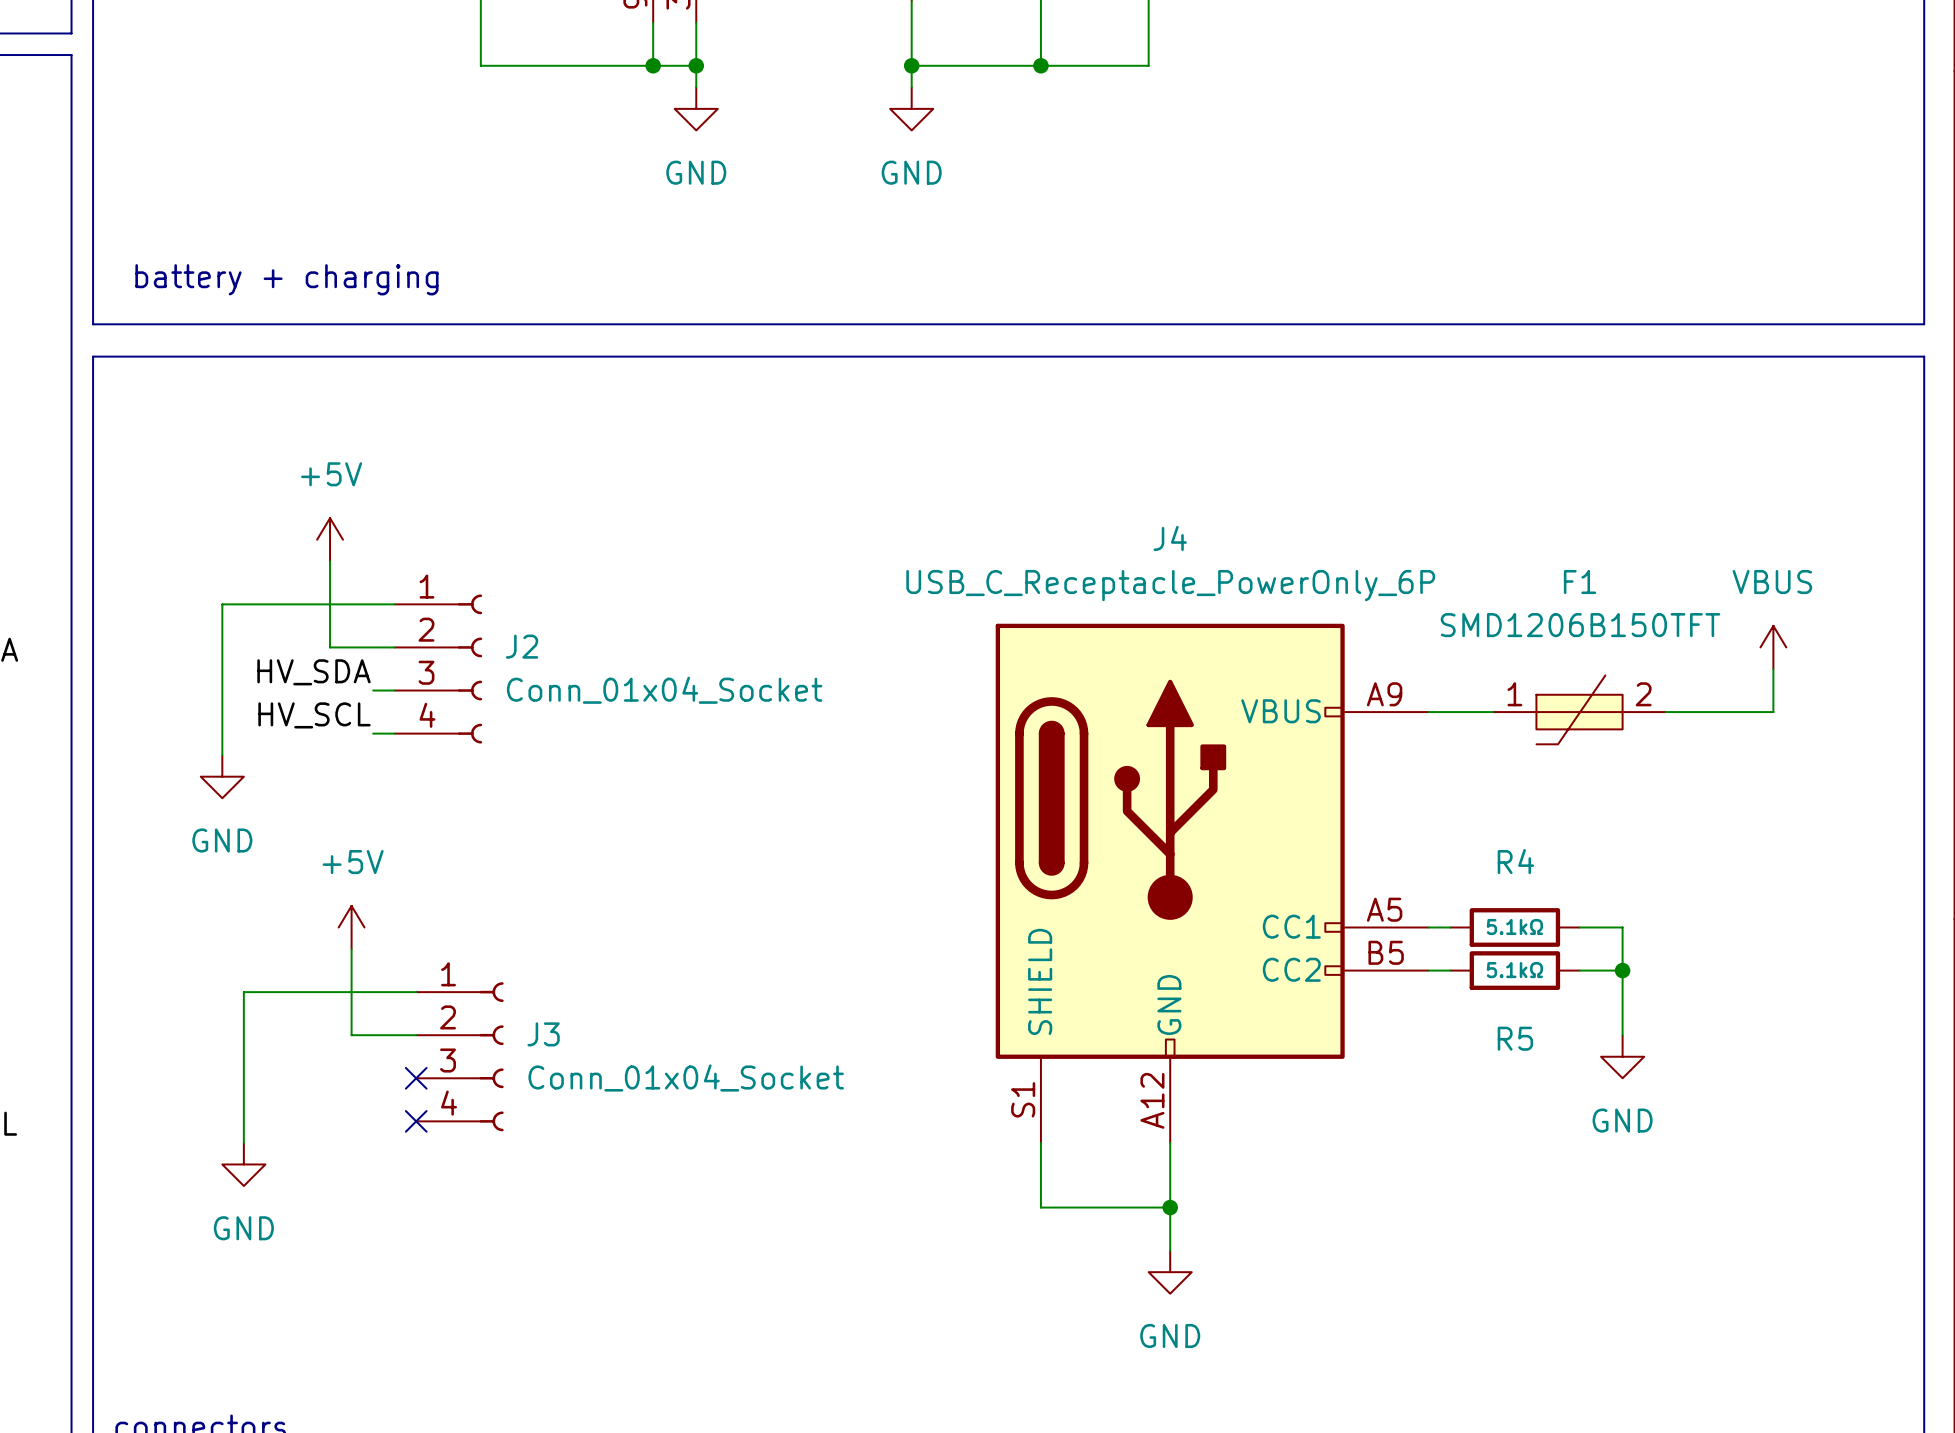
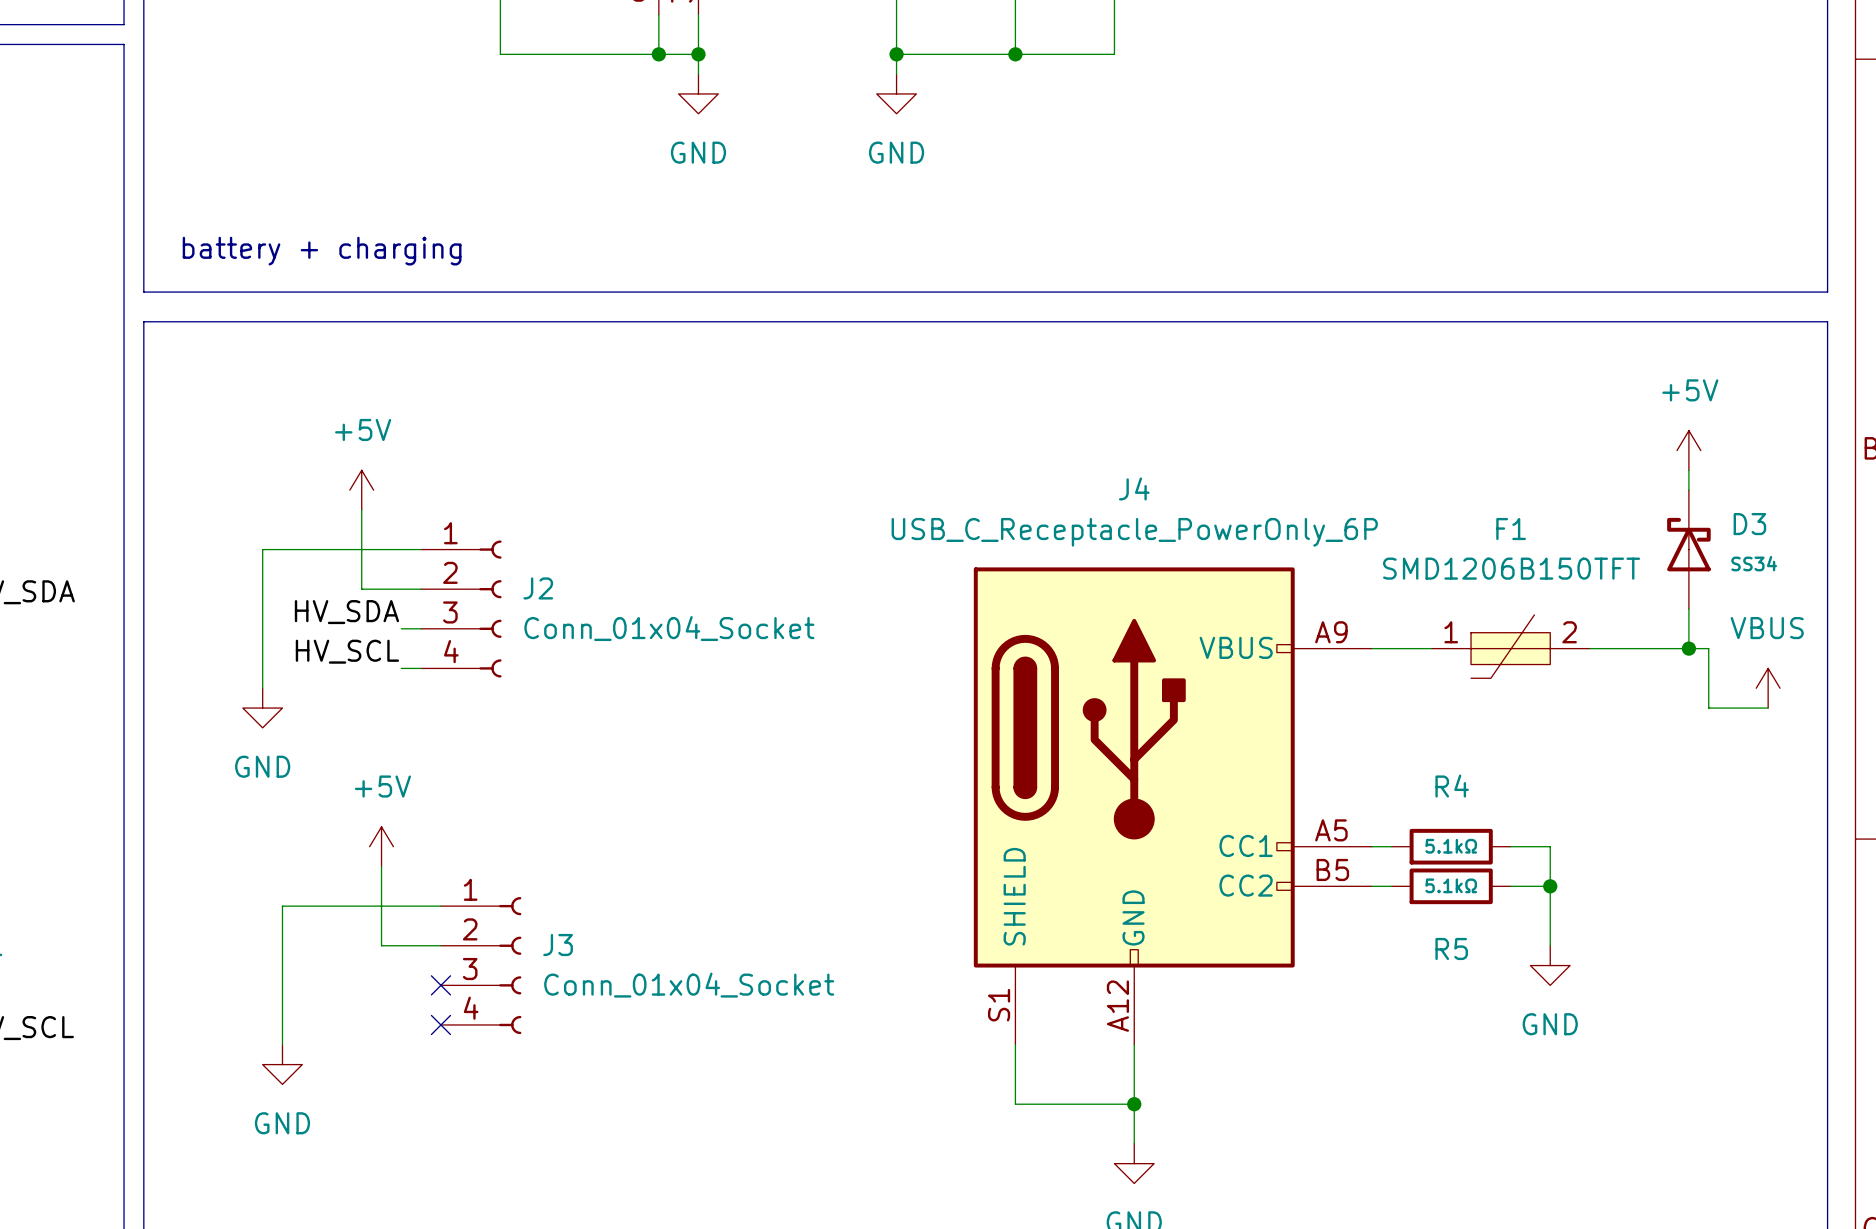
power symbol: none -> +5V (1688, 450)
wire: none -> (1688, 470) (1688, 490)
D3: none -> SS34 (1688, 549)
power symbol position: VBUS (1773, 647) -> VBUS (1768, 688)
wire: none -> (1688, 648) (1708, 648) (1708, 708) (1768, 708)
junction: none -> (1688, 648)

